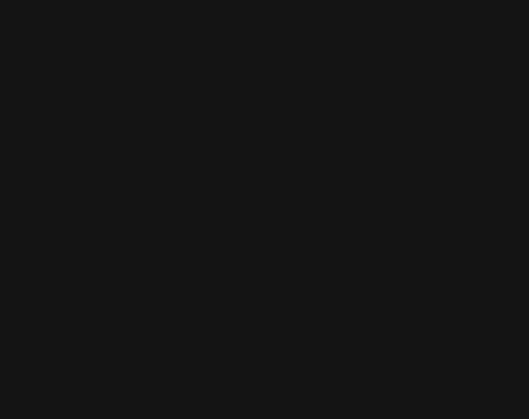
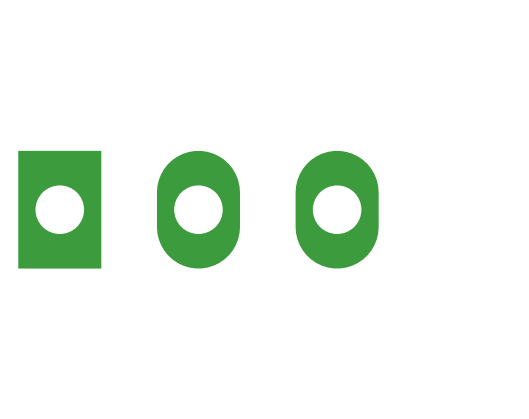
part: none -> (198, 209)

